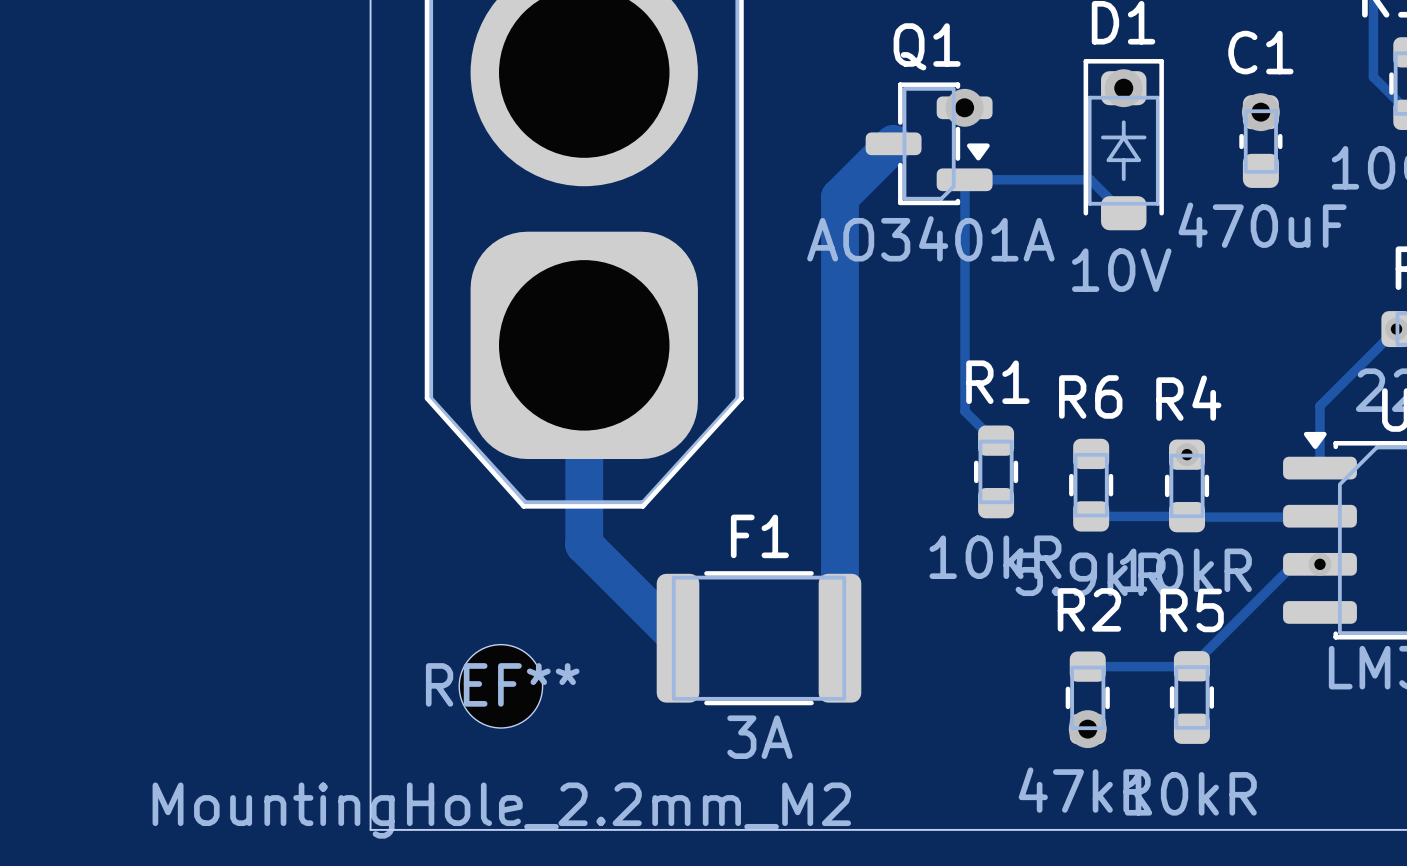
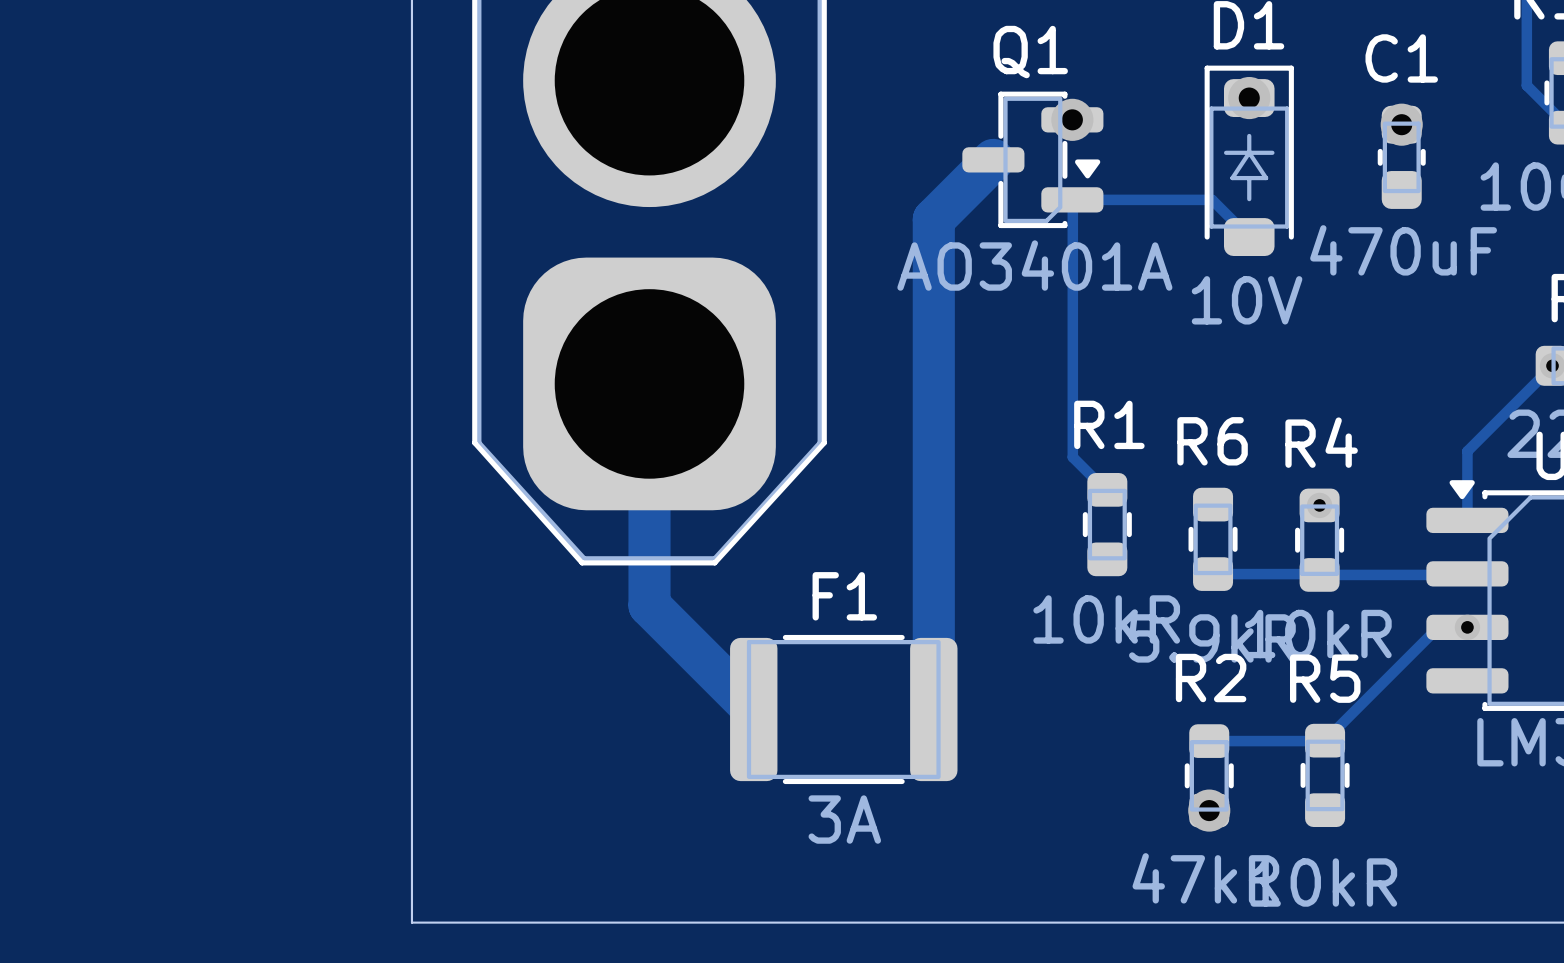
REF**: MountingHole_2.2mm_M2 (500, 686) -> none

